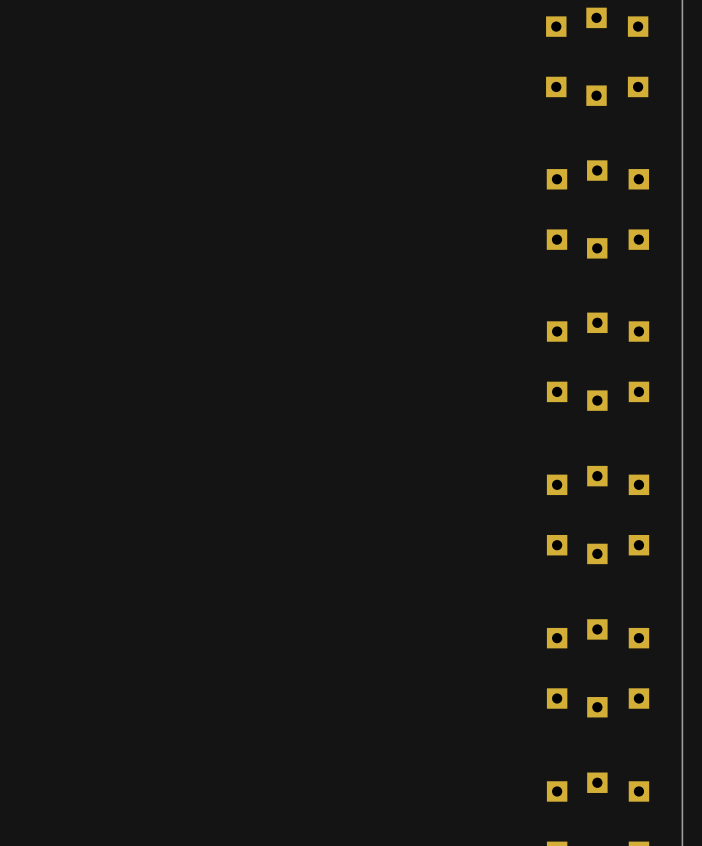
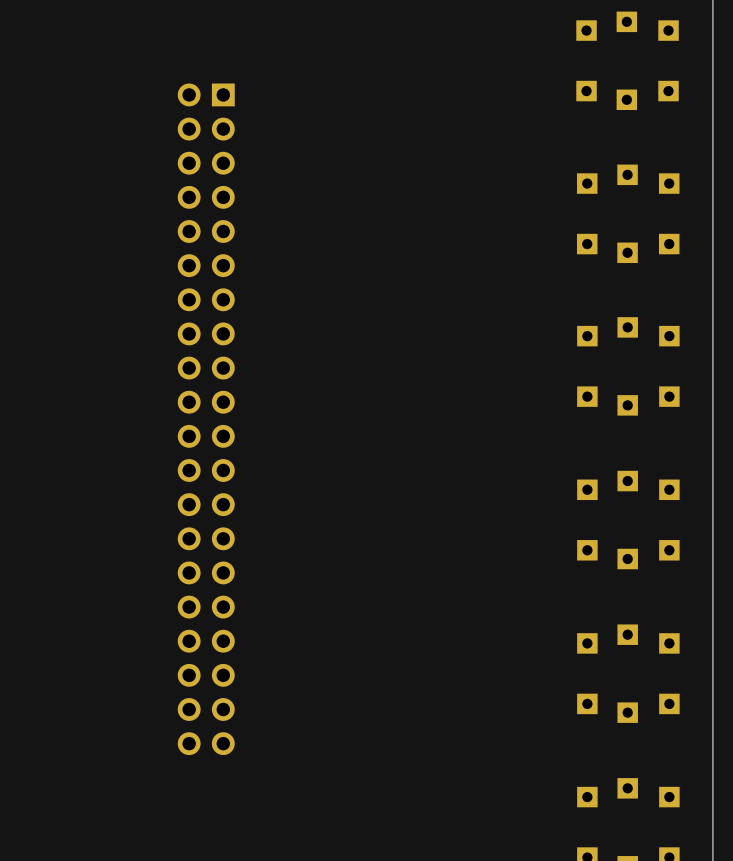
part: none -> (206, 419)

